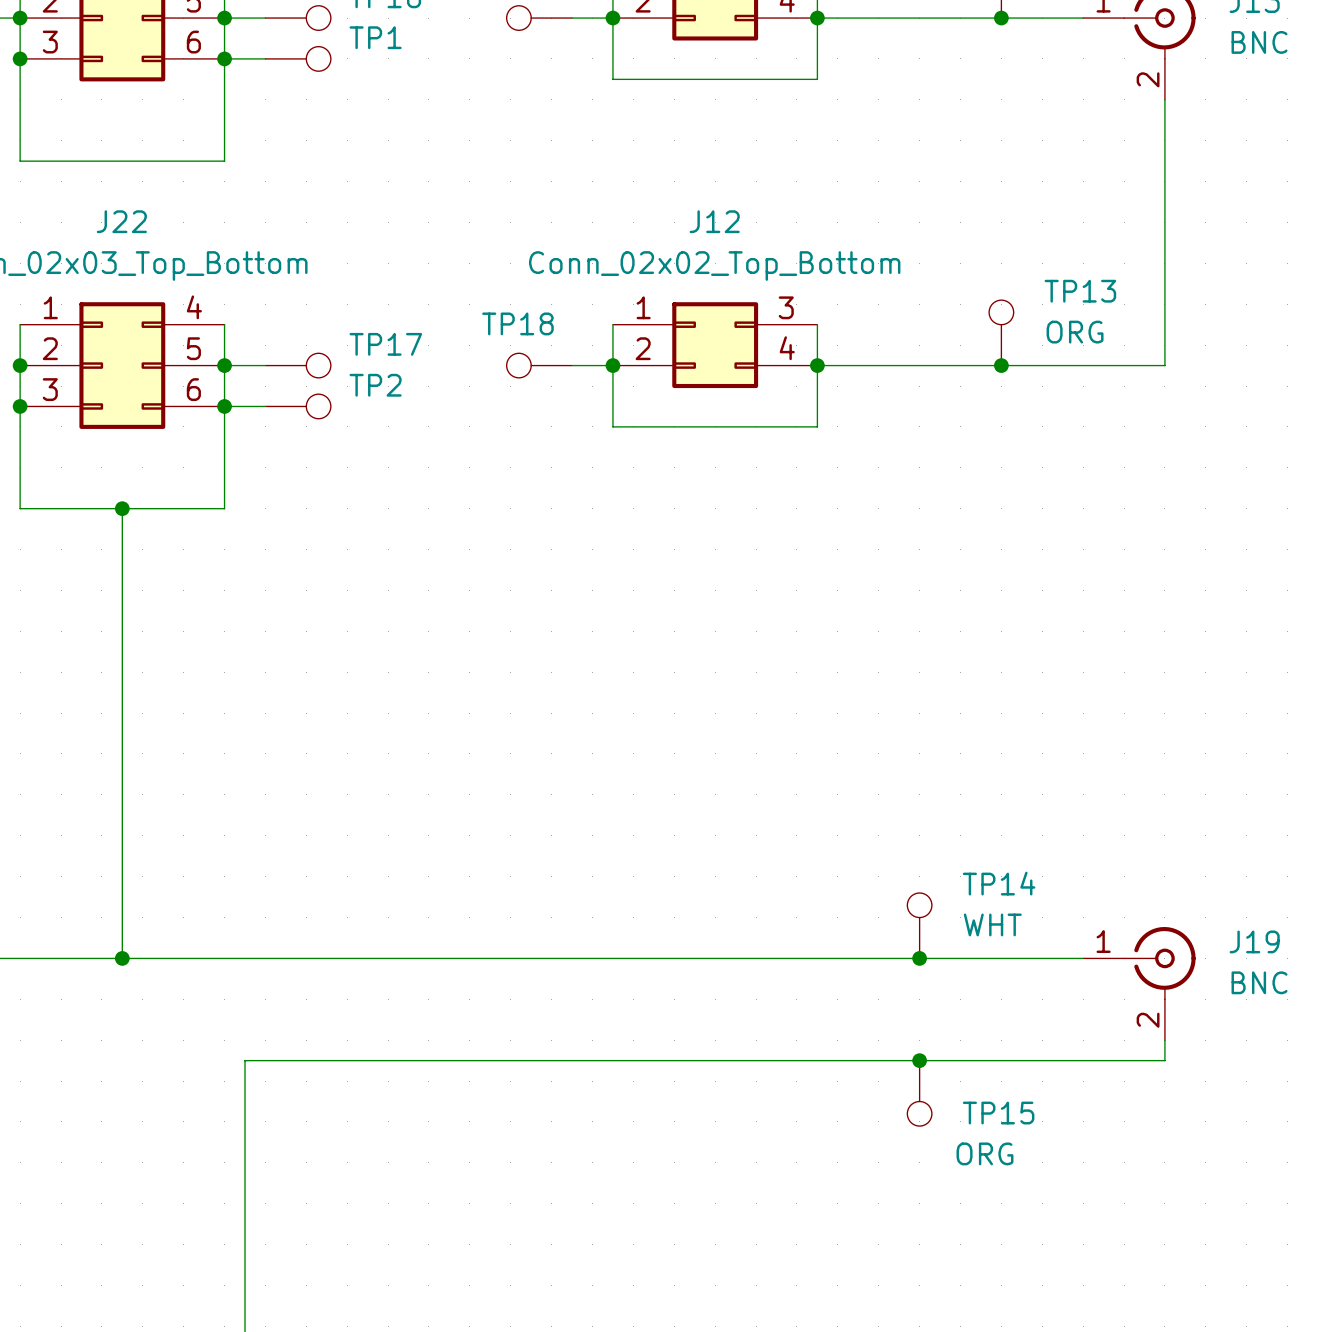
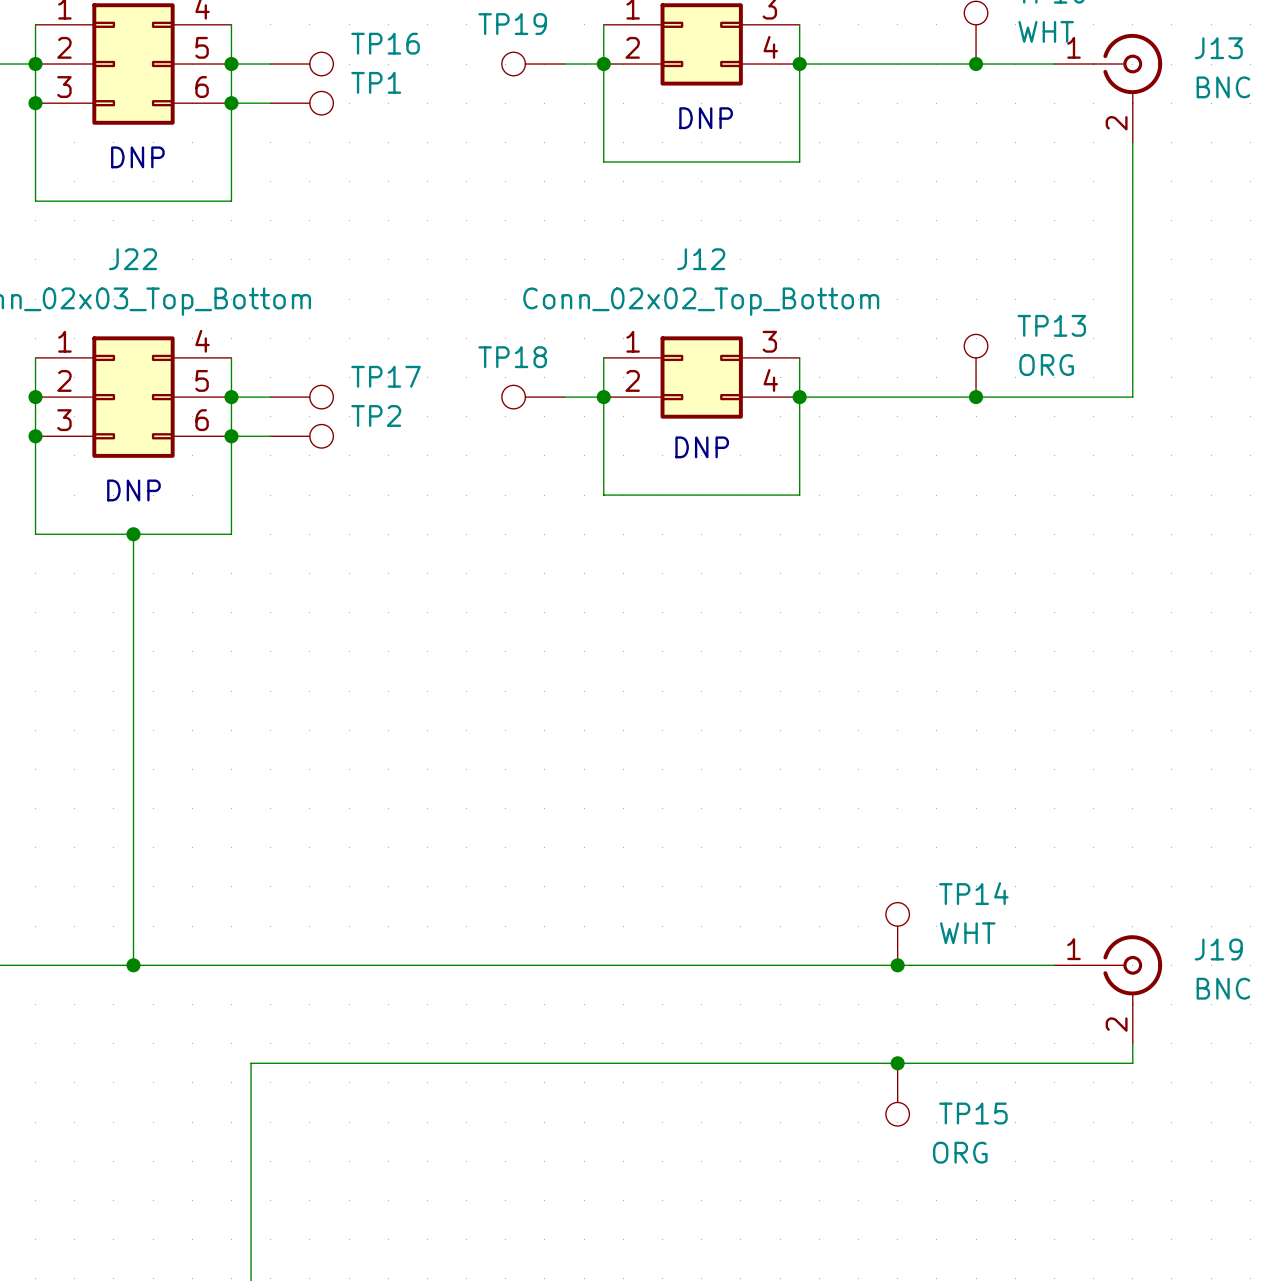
text: none -> DNP (706, 118)
wire: (612, 79) (817, 79) -> (603, 122) (603, 161) (799, 161) (799, 122)
text: none -> DNP (137, 157)
text: none -> DNP (702, 447)
wire: (612, 426) (817, 426) -> (603, 455) (603, 495) (799, 495) (799, 455)
text: none -> DNP (133, 490)

